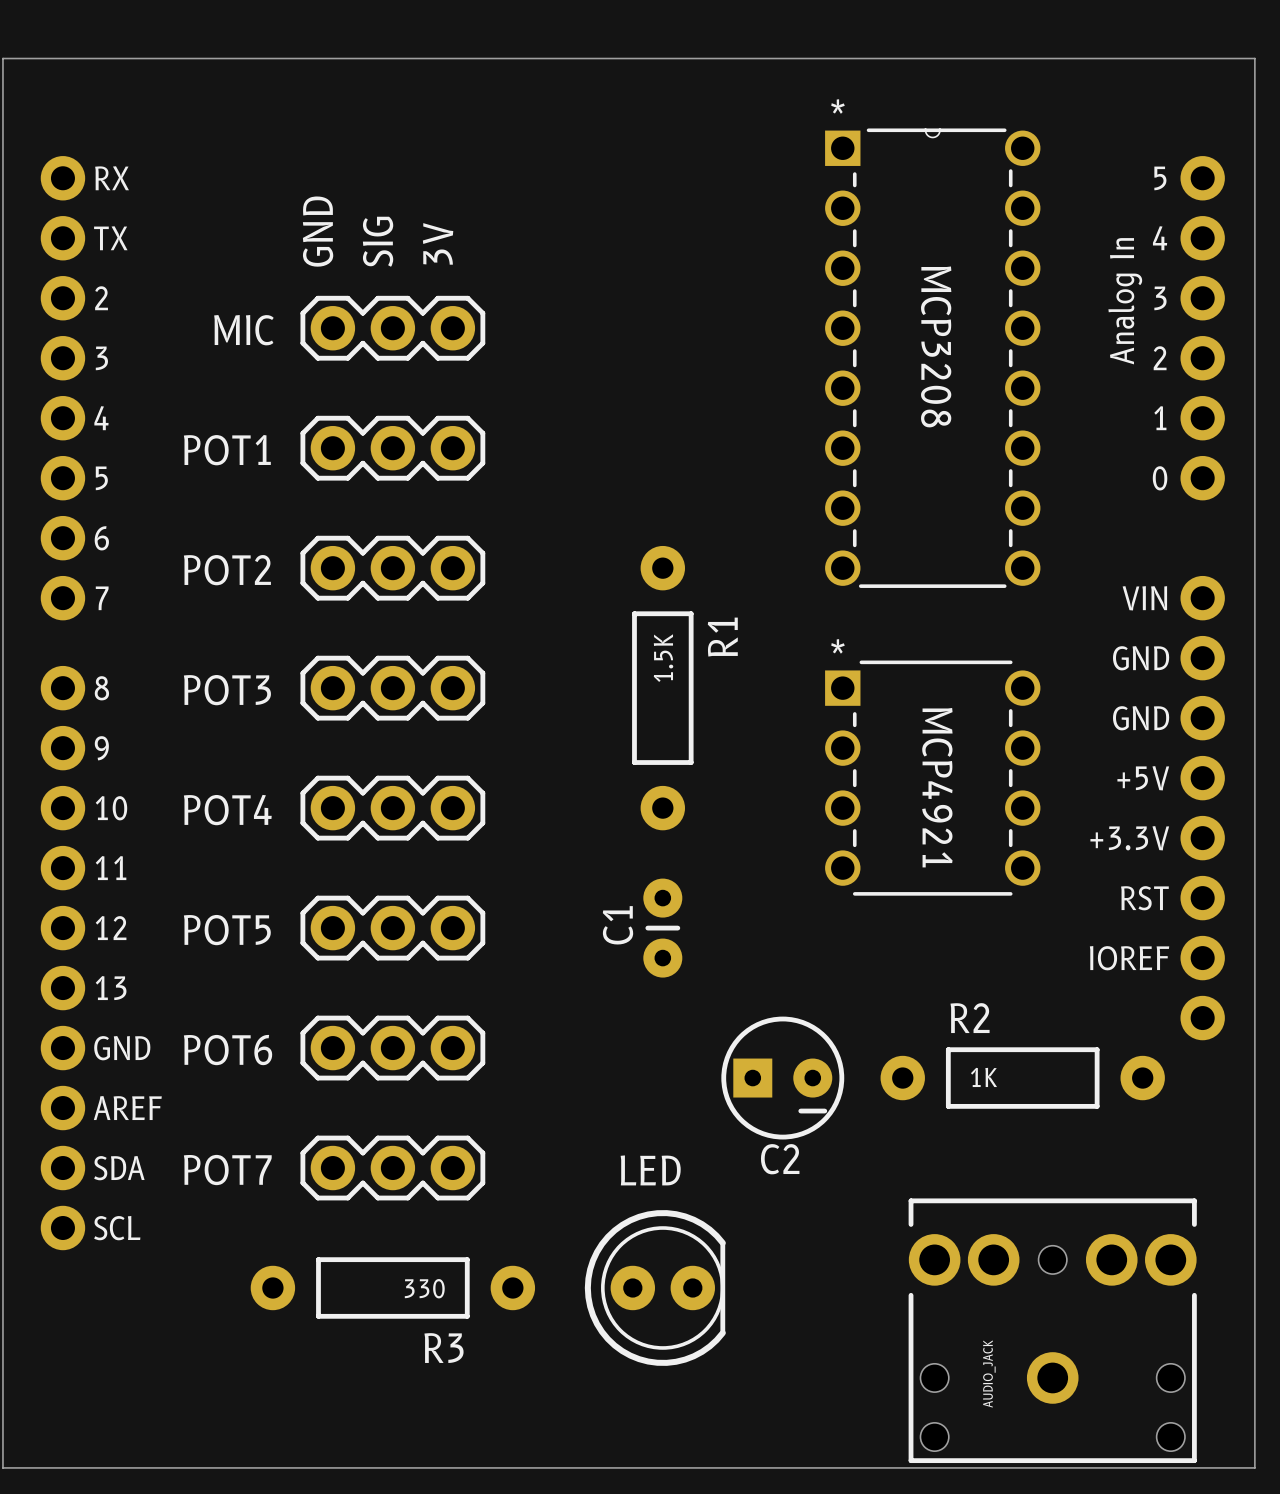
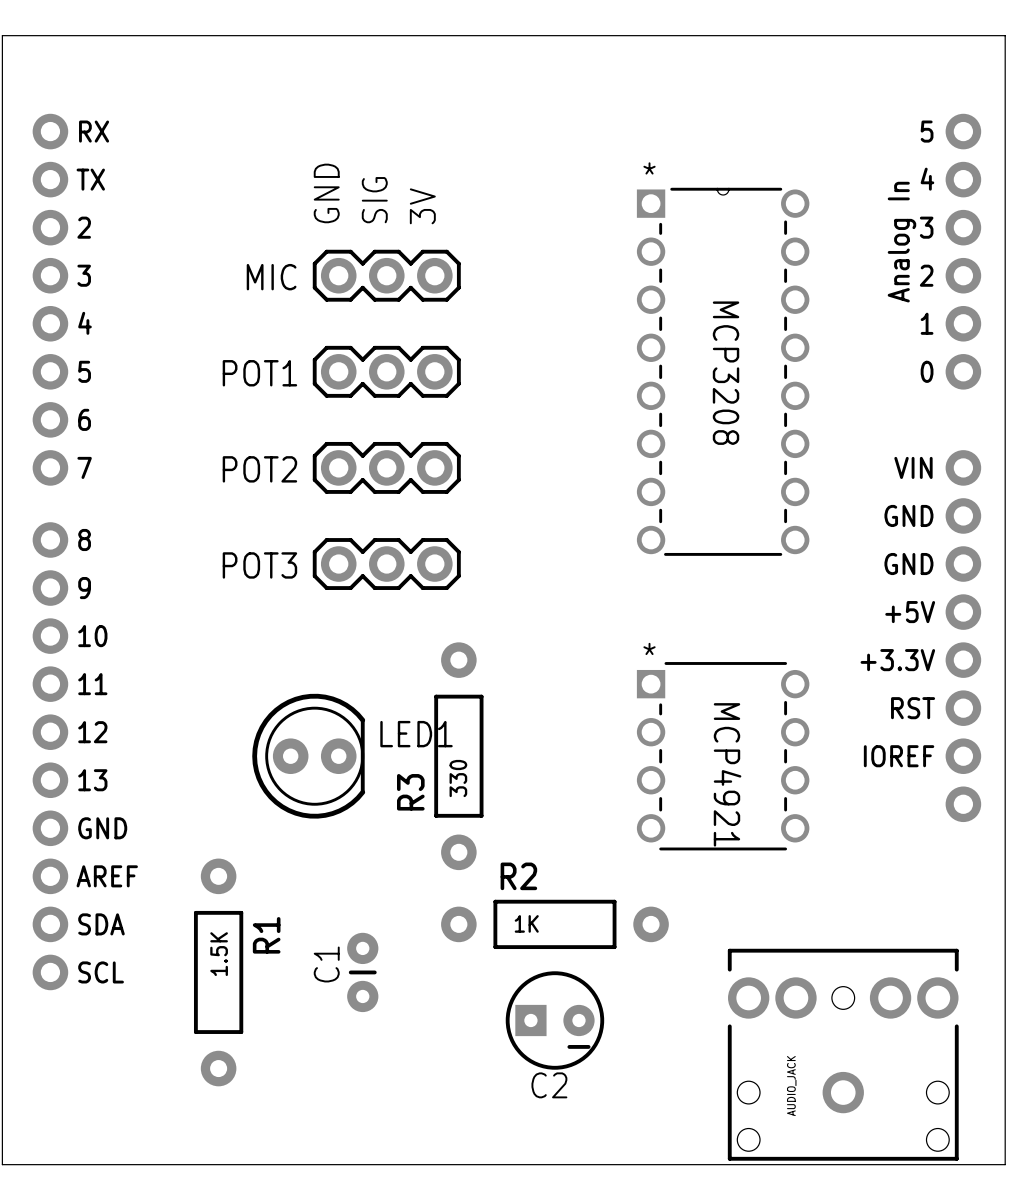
text position: GND (318, 231) -> GND (326, 193)
text position: SIG (378, 241) -> SIG (374, 200)
text position: 3V (438, 243) -> 3V (422, 206)
MIC position: (392, 328) -> (386, 275)
MCP3208 position: (932, 358) -> (723, 371)
POT1 position: (392, 448) -> (386, 371)
POT2 position: (392, 568) -> (386, 467)
POT3 position: (392, 688) -> (386, 564)
R1 position: (662, 688) -> (218, 972)
MCP4921 position: (932, 778) -> (723, 756)
POT4: (392, 808) -> none
POT5: (392, 928) -> none
C1 position: (662, 928) -> (362, 972)
LED1: none -> (308, 756)
POT6: (392, 1048) -> none
C2 position: (782, 1078) -> (554, 1020)
R2 position: (1022, 1078) -> (554, 924)
POT7: (392, 1168) -> none
R3 rotation: 0° (392, 1287) -> 90° clockwise (458, 756)
R3 position: (392, 1287) -> (458, 756)
LED: (655, 1287) -> none

